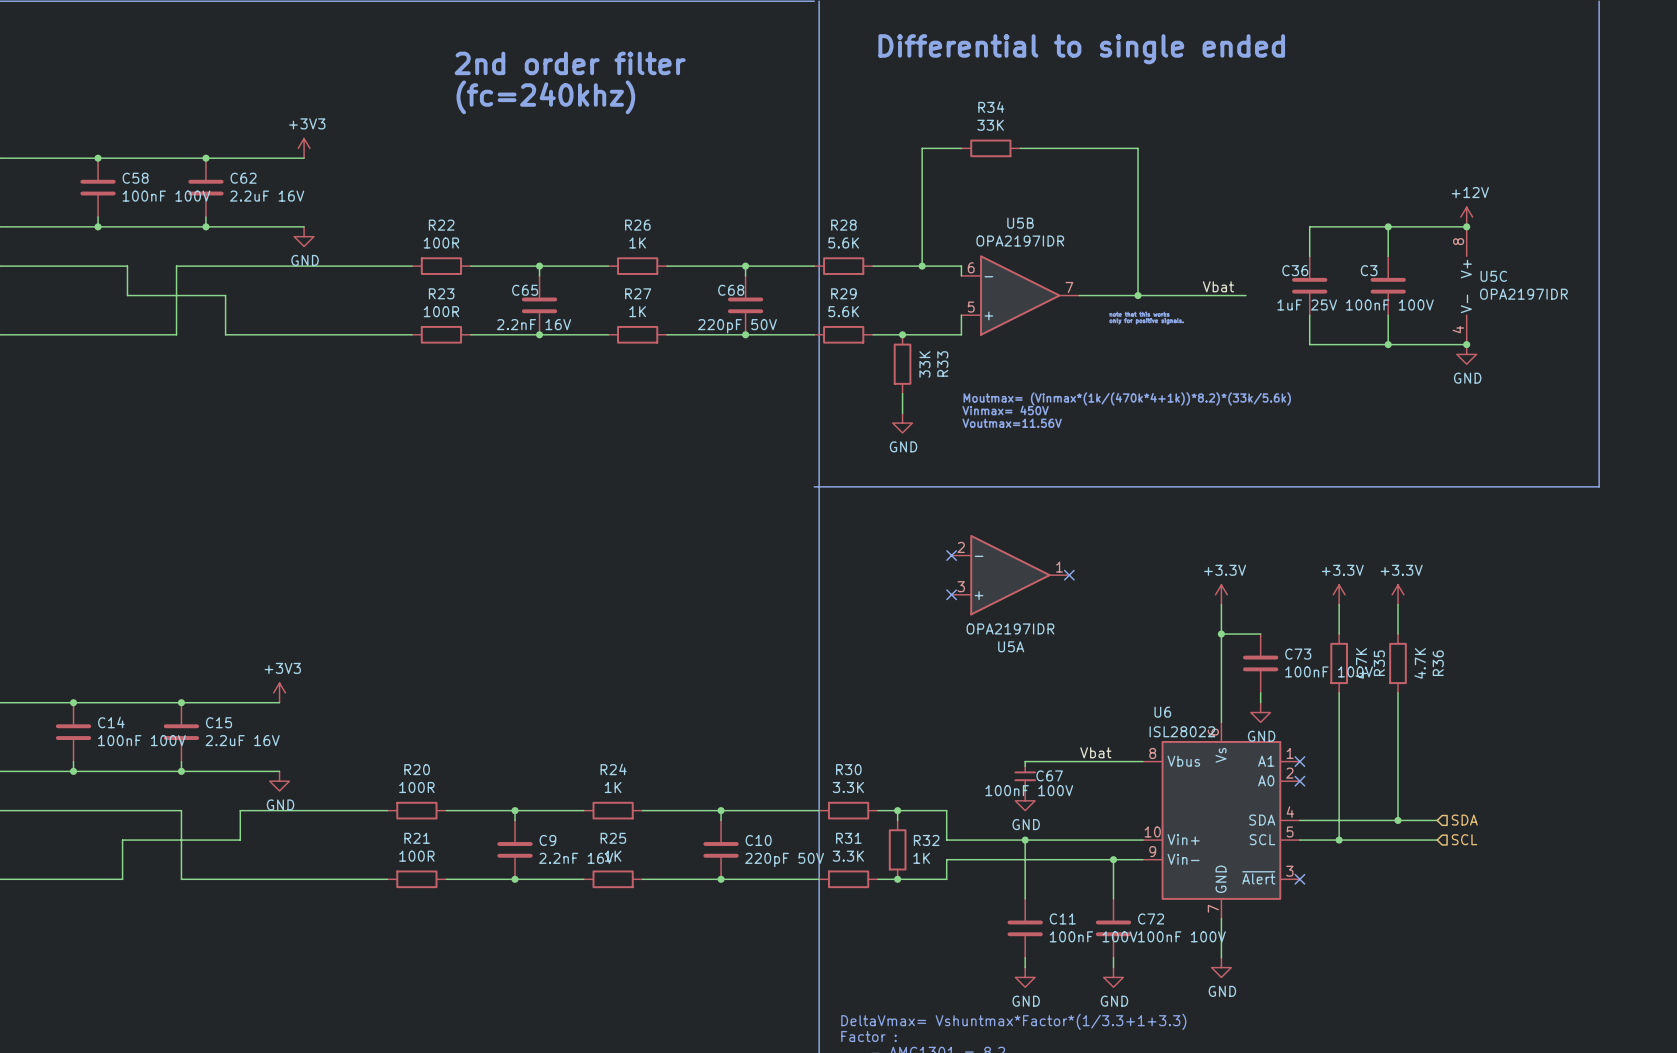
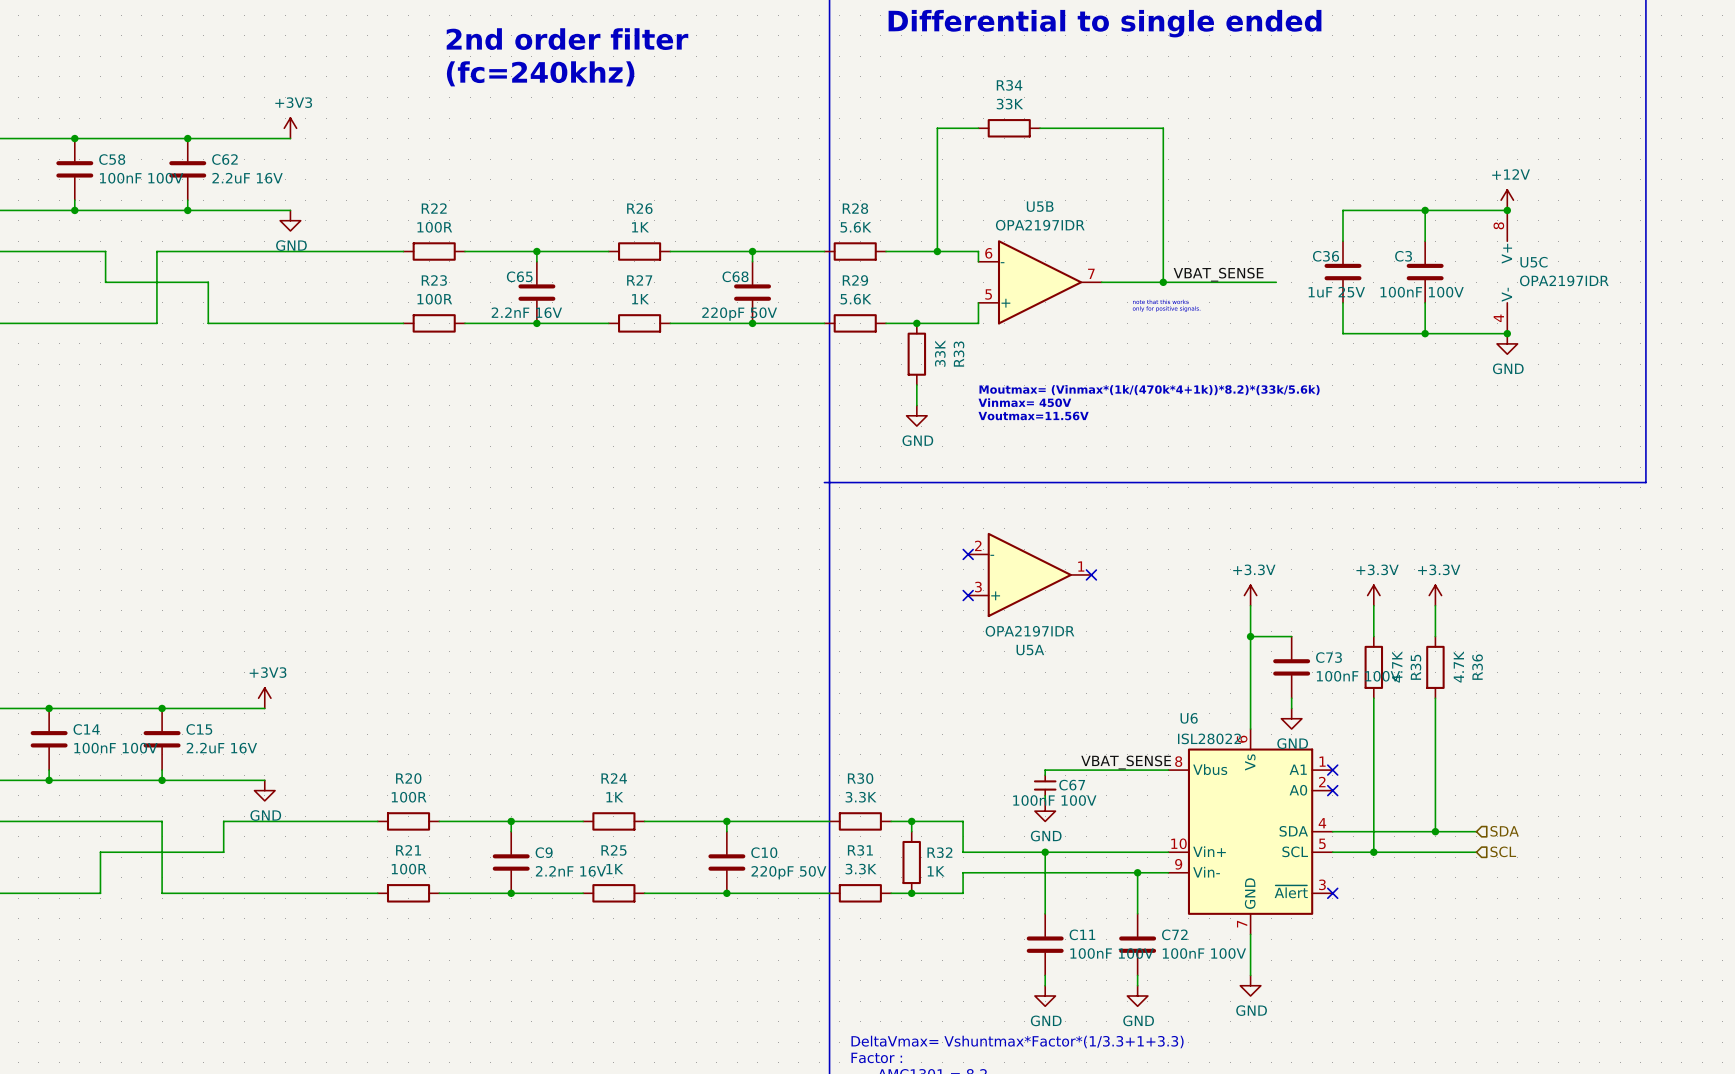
label: Vbat (1218, 286) -> none
label: none -> VBAT_SENSE (1218, 274)
label: Vbat (1095, 752) -> none
label: none -> VBAT_SENSE (1126, 762)

